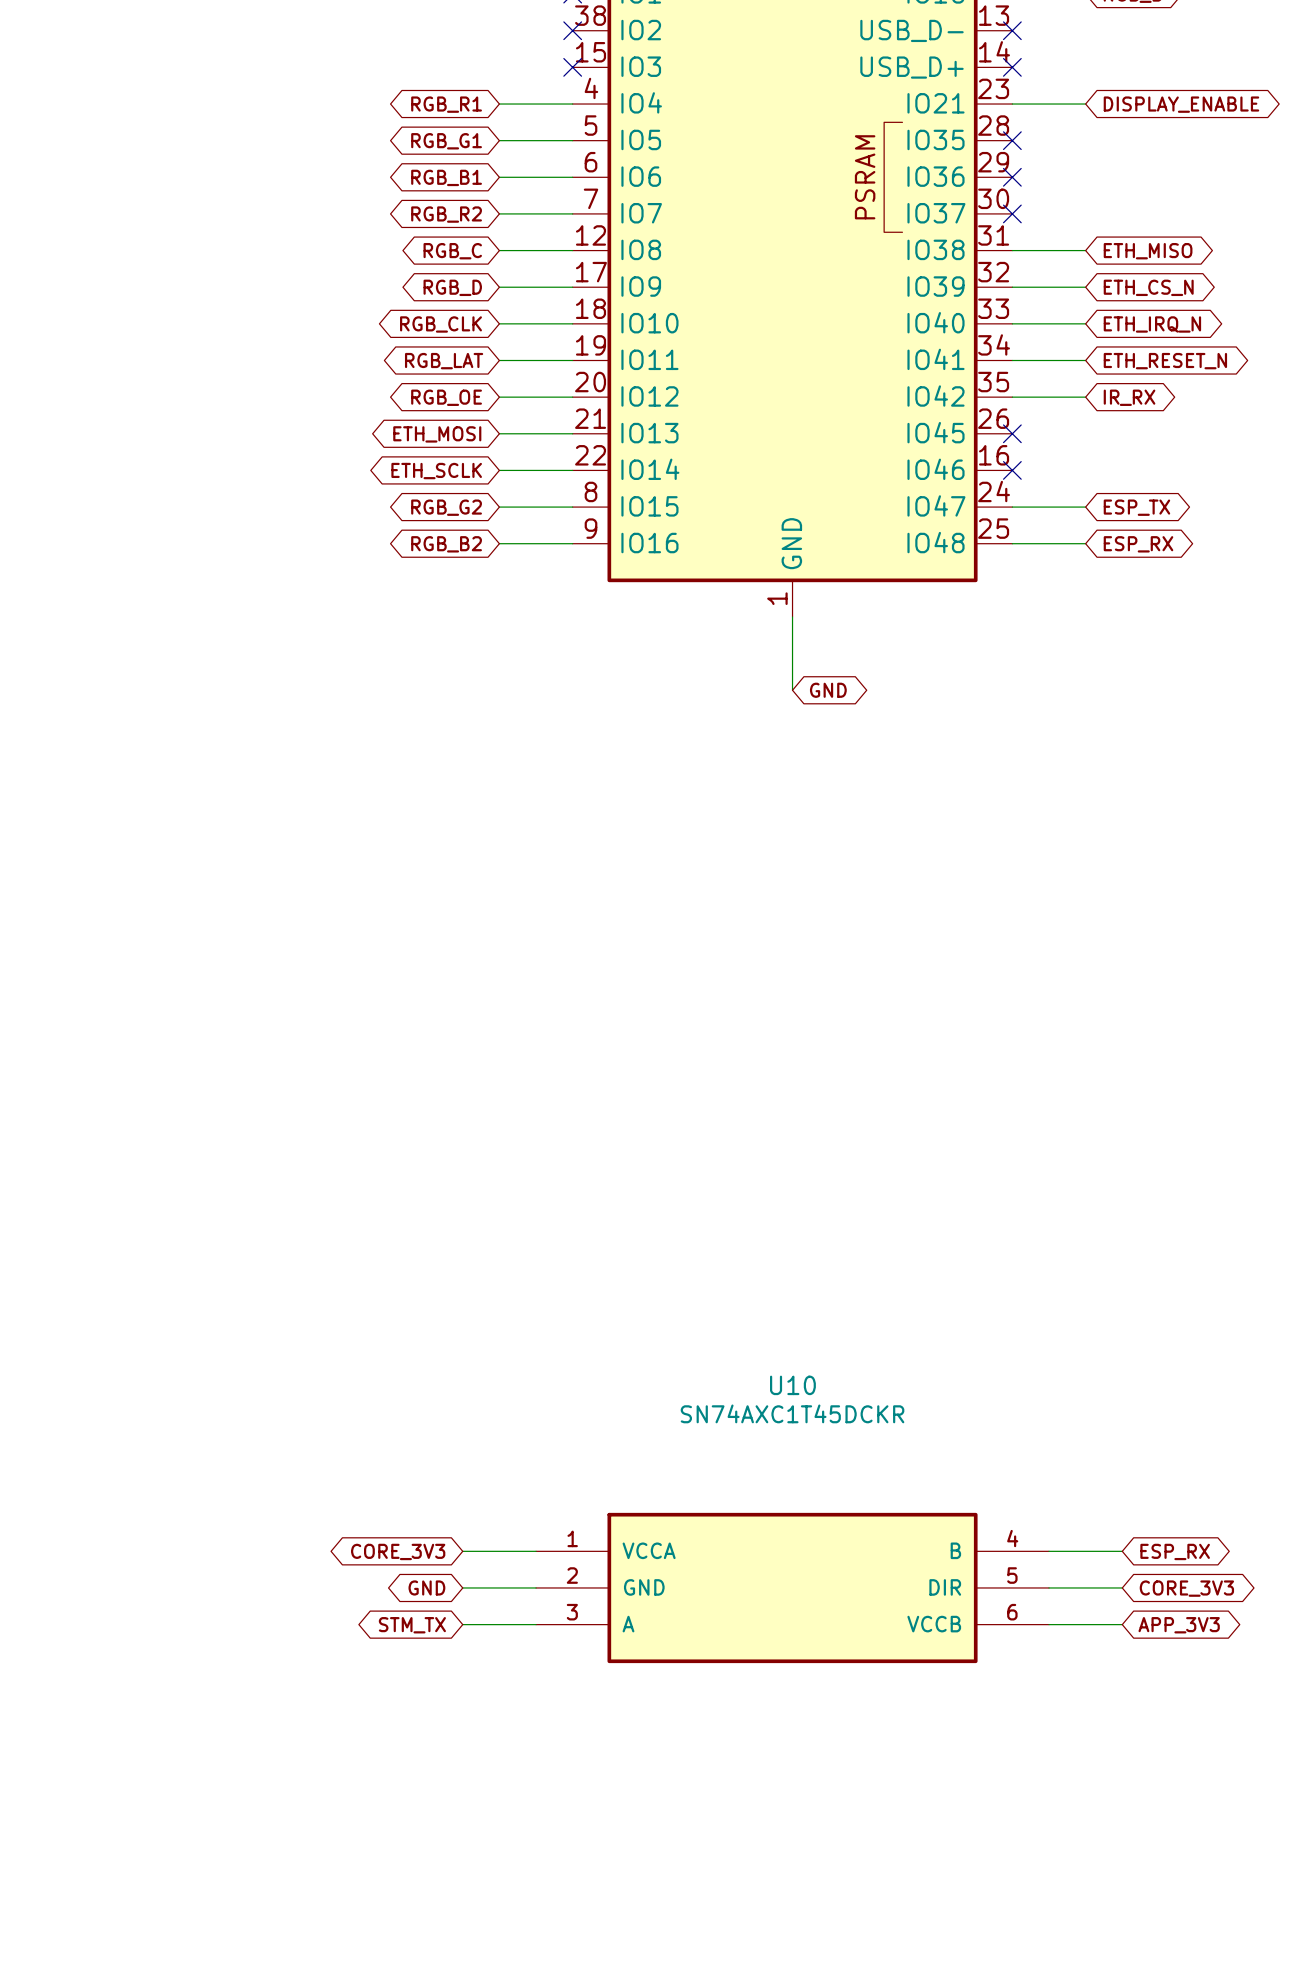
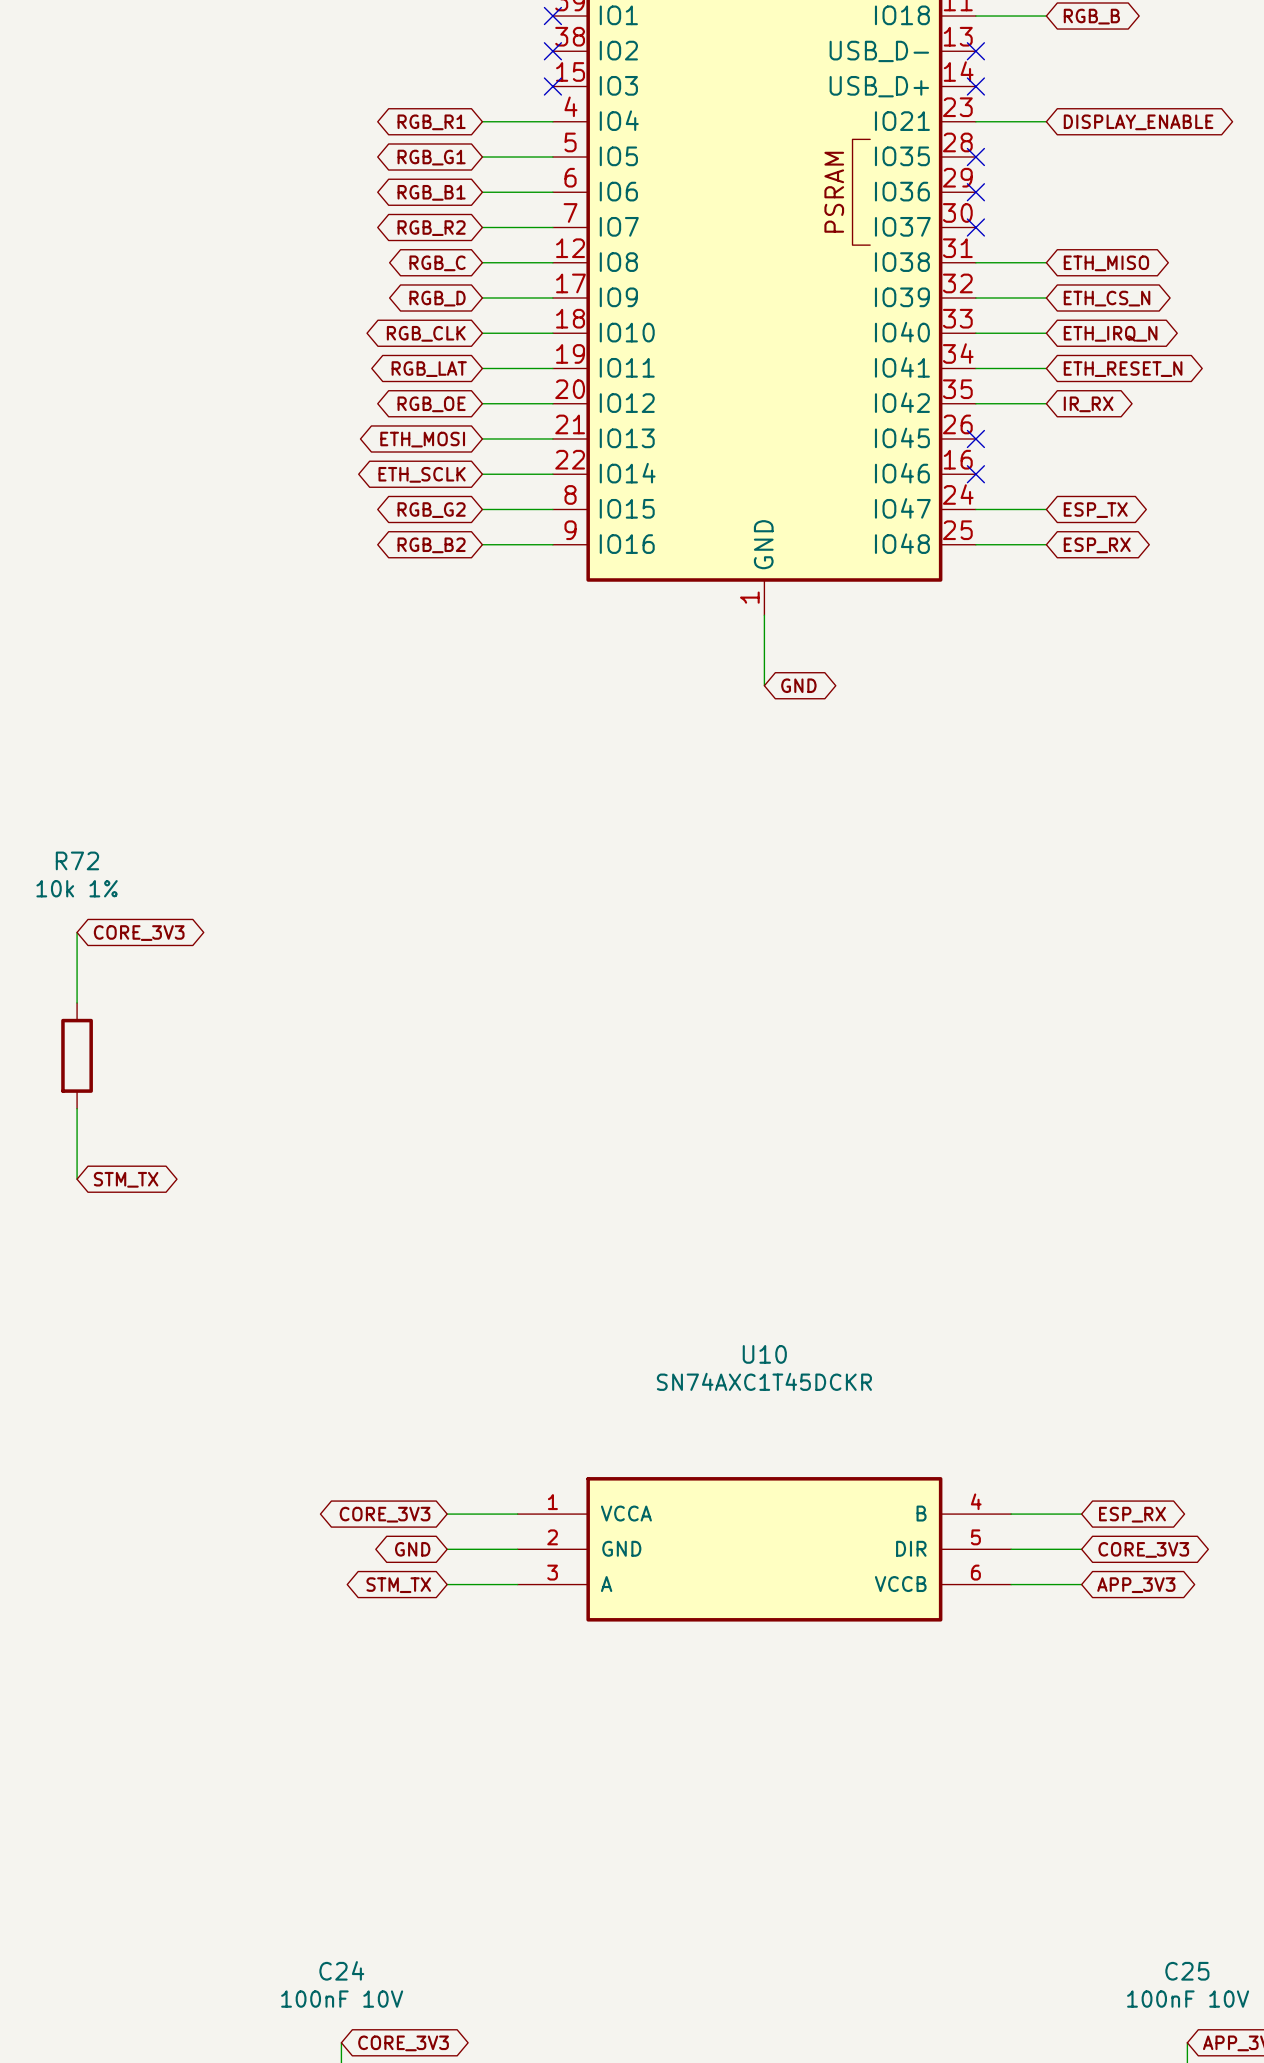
wire: none -> (77, 932) (77, 1002)
global label: none -> CORE_3V3 (139, 933)
R72: none -> 10k 1% (77, 1055)
wire: none -> (77, 1108) (77, 1179)
global label: none -> STM_TX (126, 1179)

